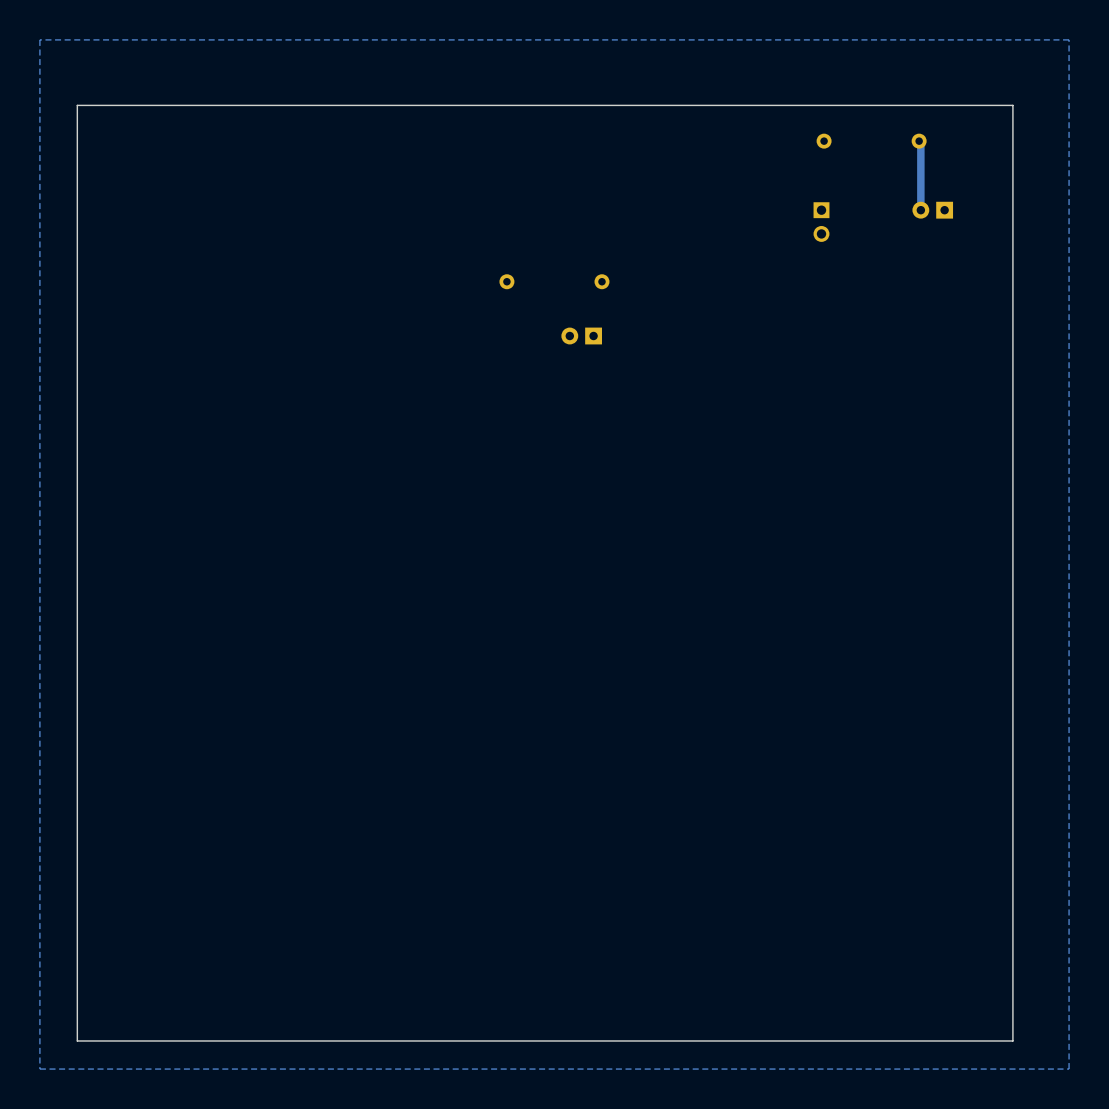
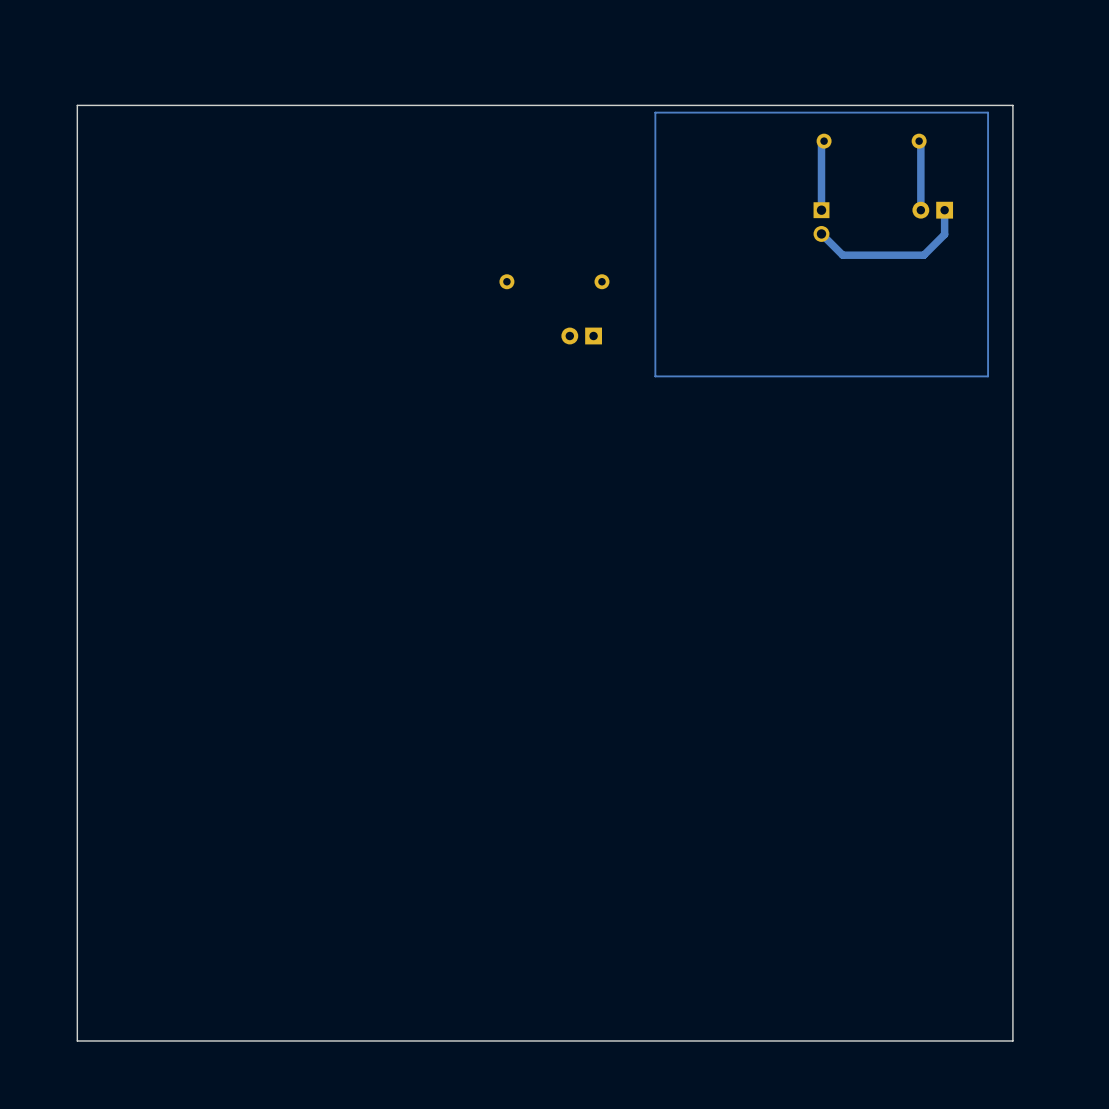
zone outline: (1069, 39) (1069, 1069) (39, 1069) (39, 39) (1069, 39) -> none
track: none -> (988, 112) (655, 112) (655, 376) (988, 376) (988, 112)
track: none -> (824, 141) (821, 143) (821, 210)
track: none -> (944, 210) (944, 234) (923, 255) (842, 255) (821, 233)

